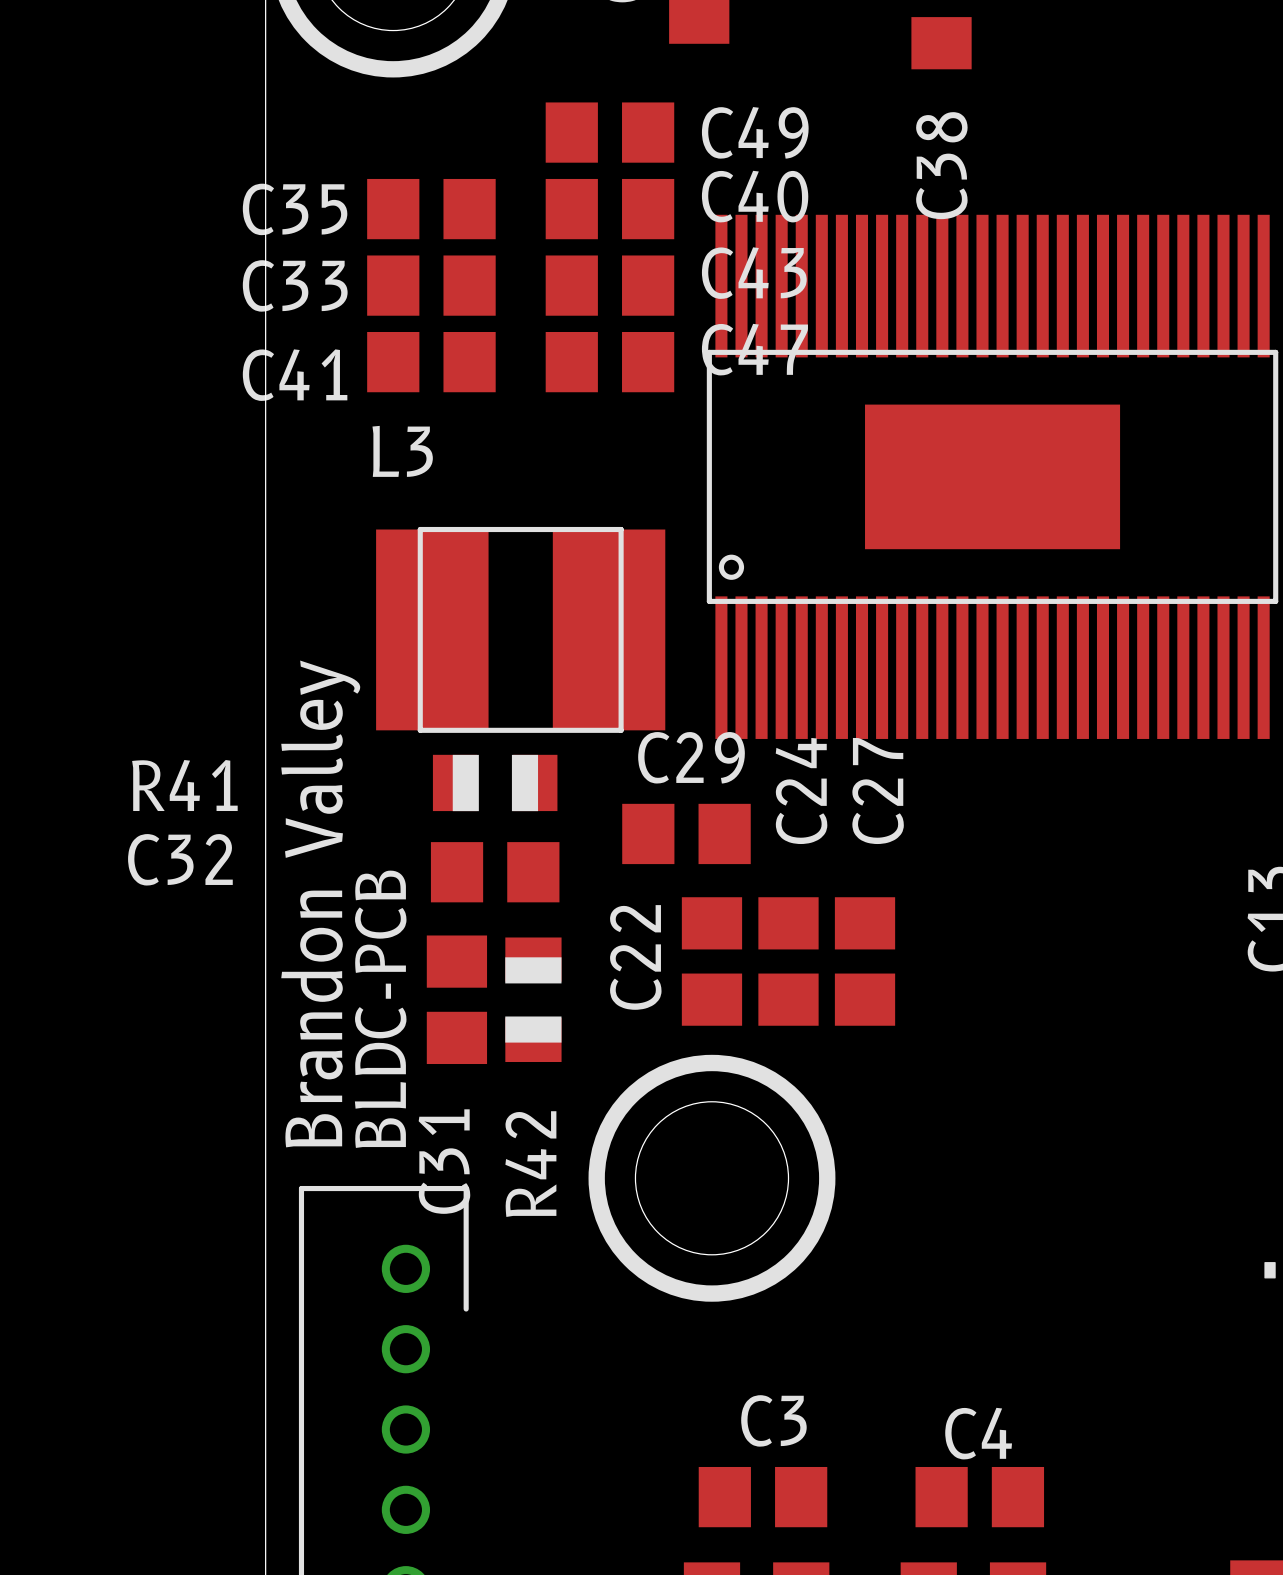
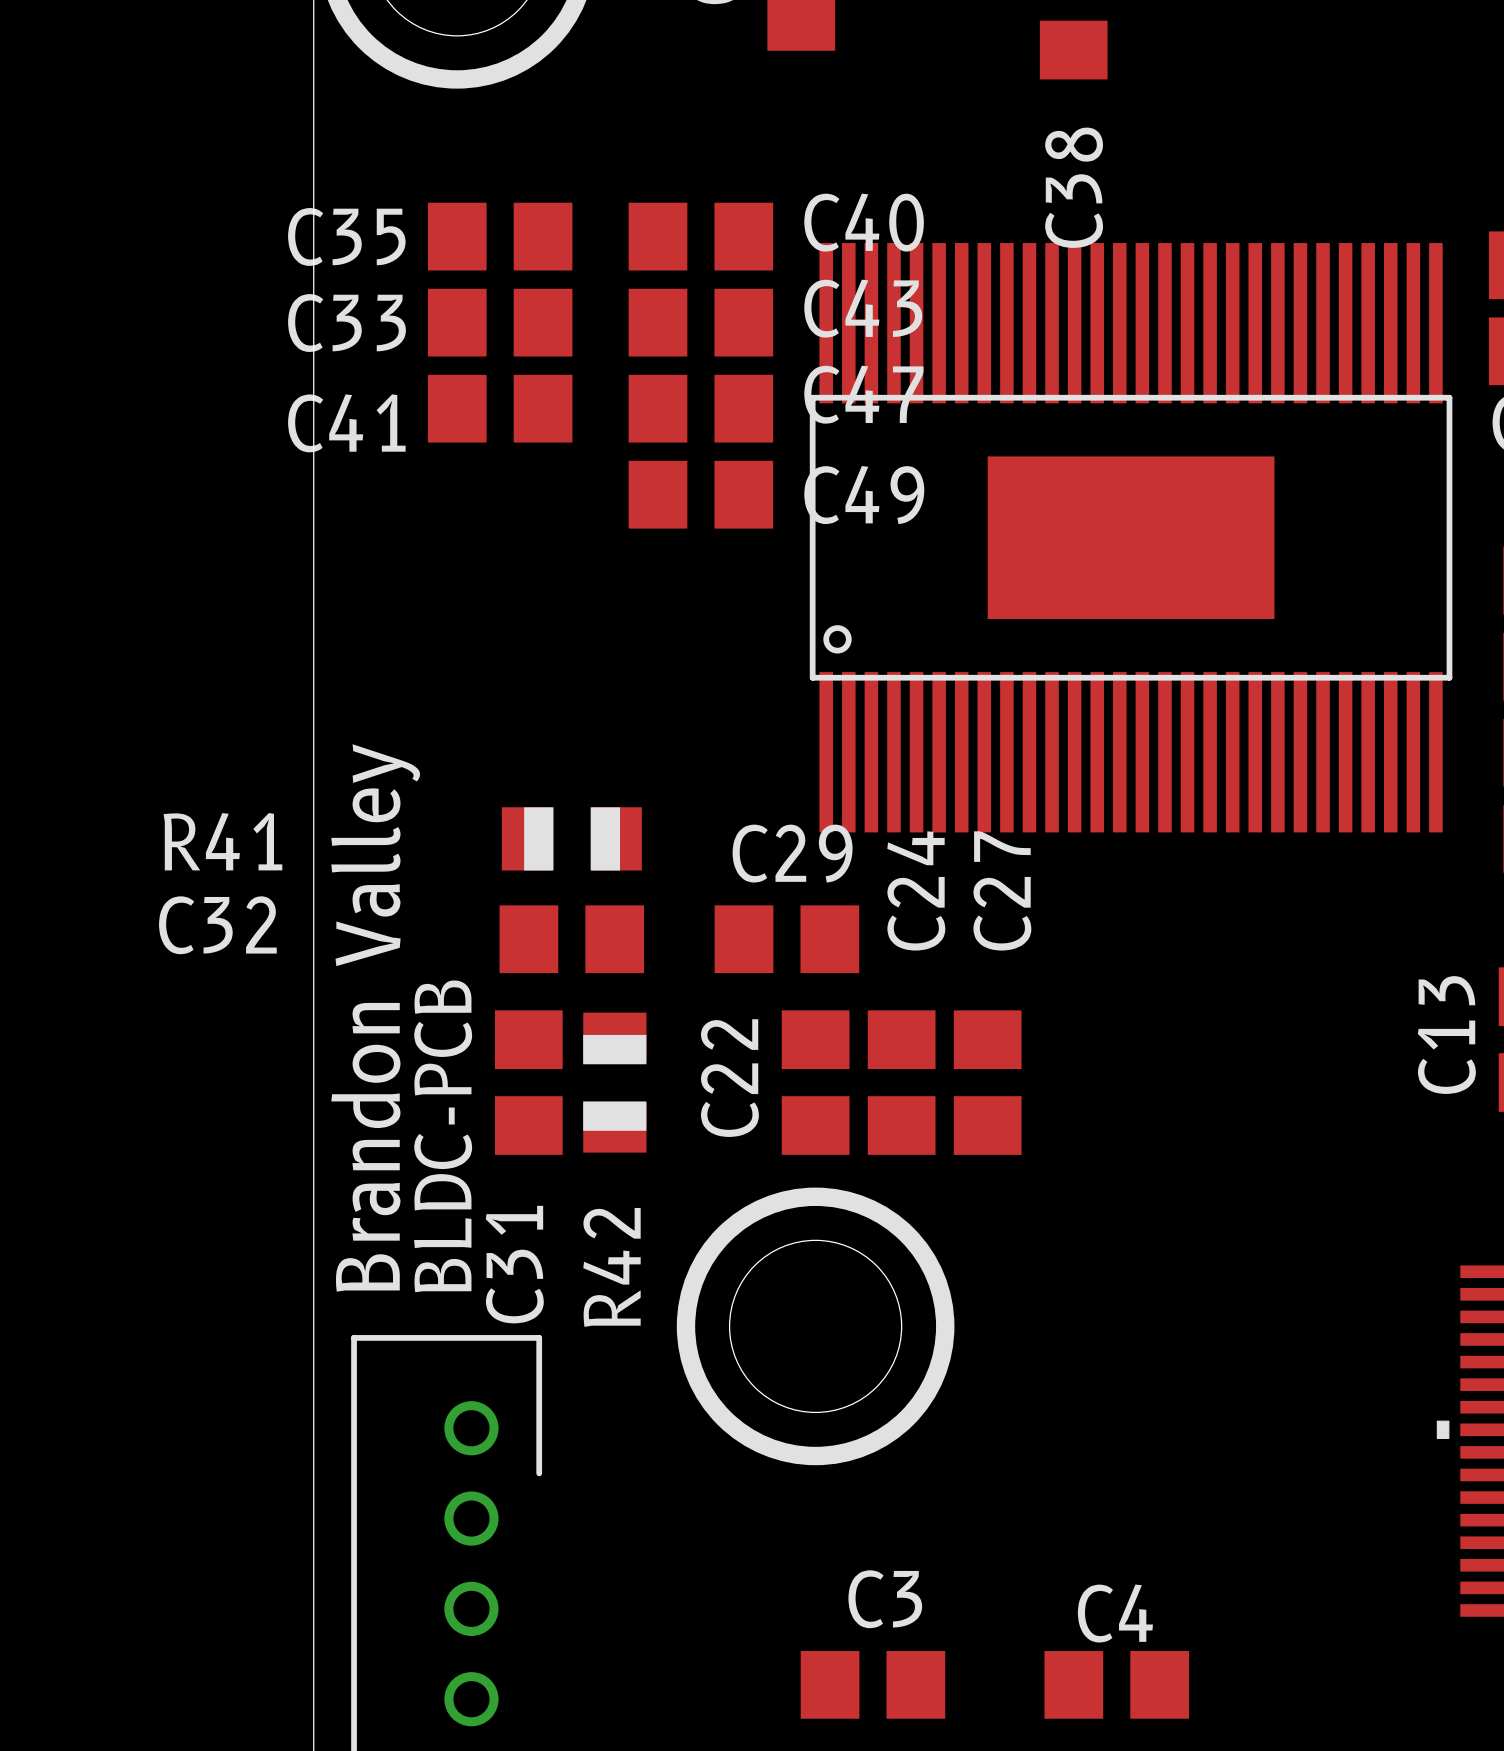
C49 position: (609, 132) -> (700, 494)
L3: (520, 629) -> none
R41 position: (495, 782) -> (571, 838)
C32 position: (495, 872) -> (571, 939)
C31 position: (456, 999) -> (528, 1082)
R42 position: (533, 999) -> (614, 1082)

